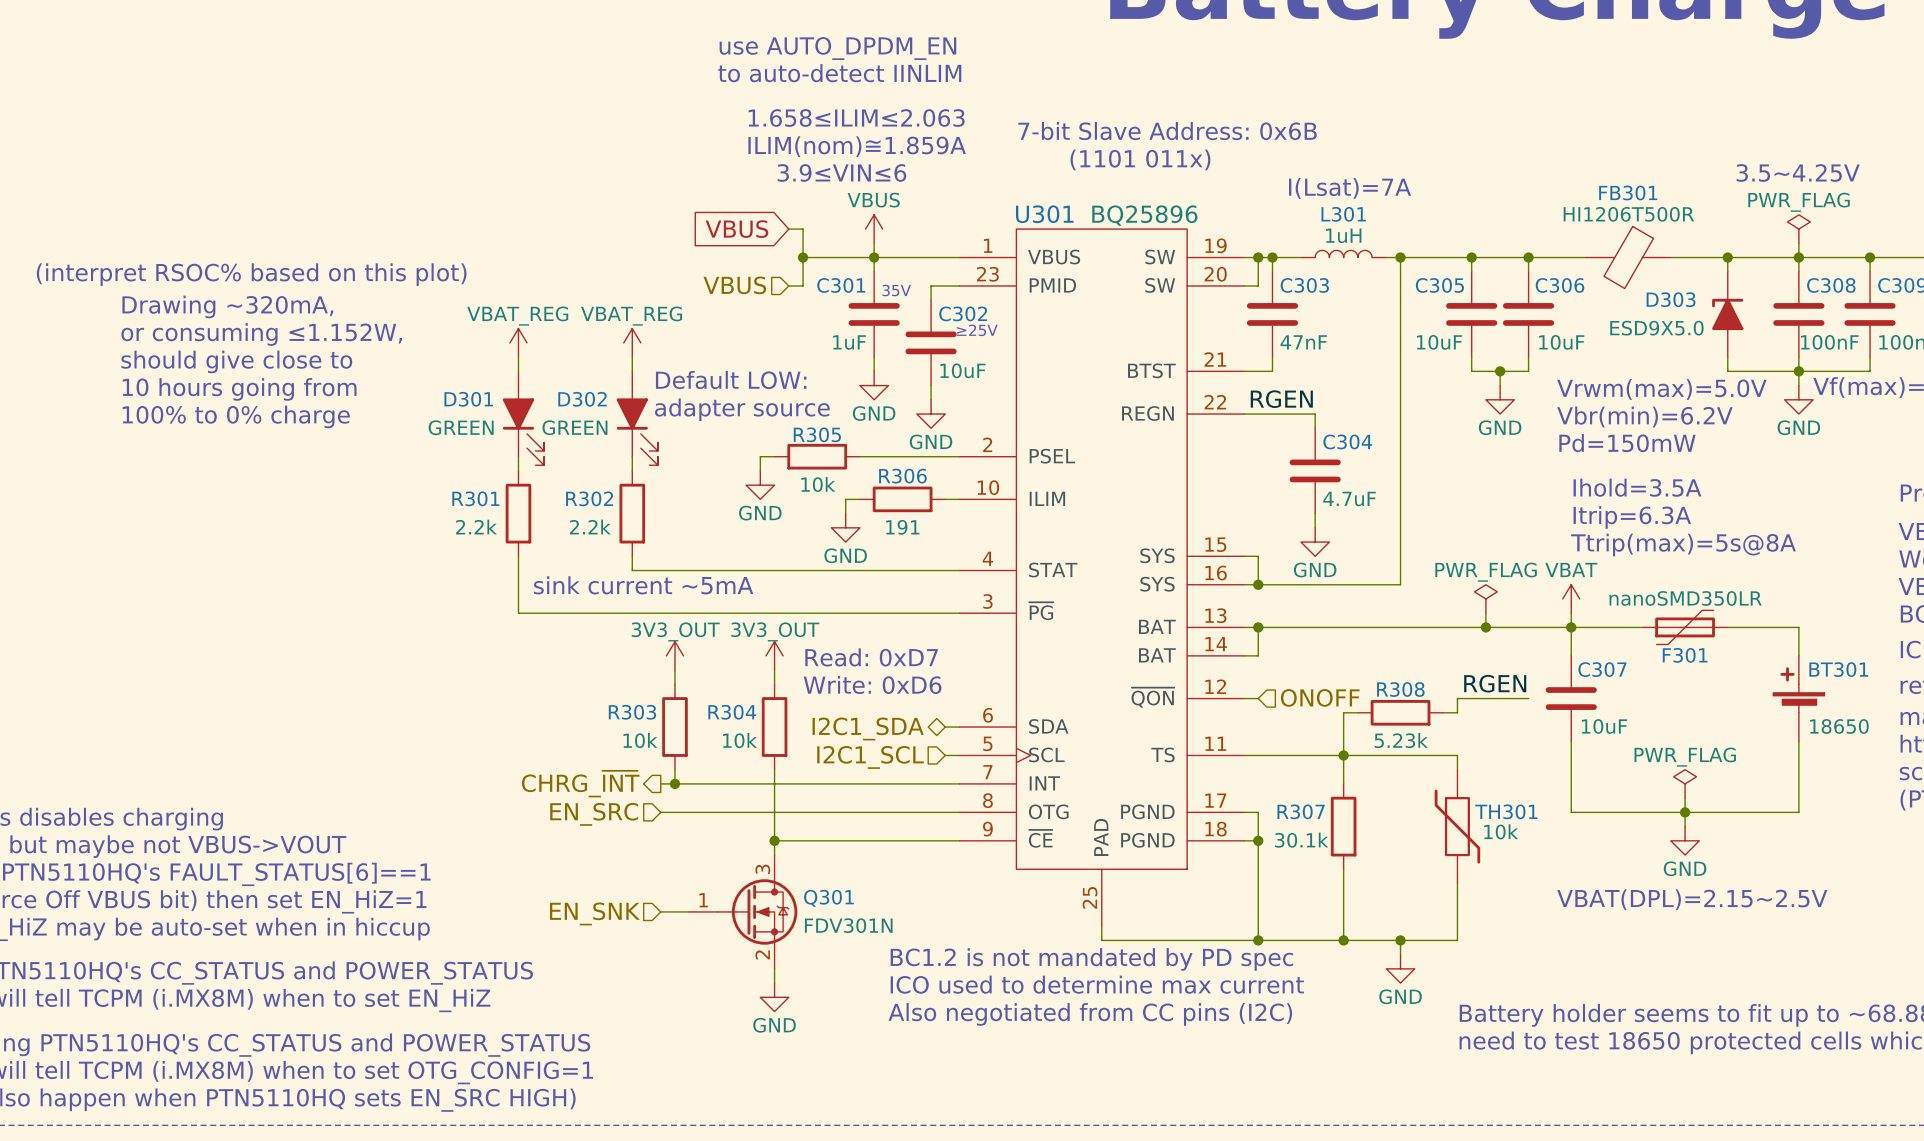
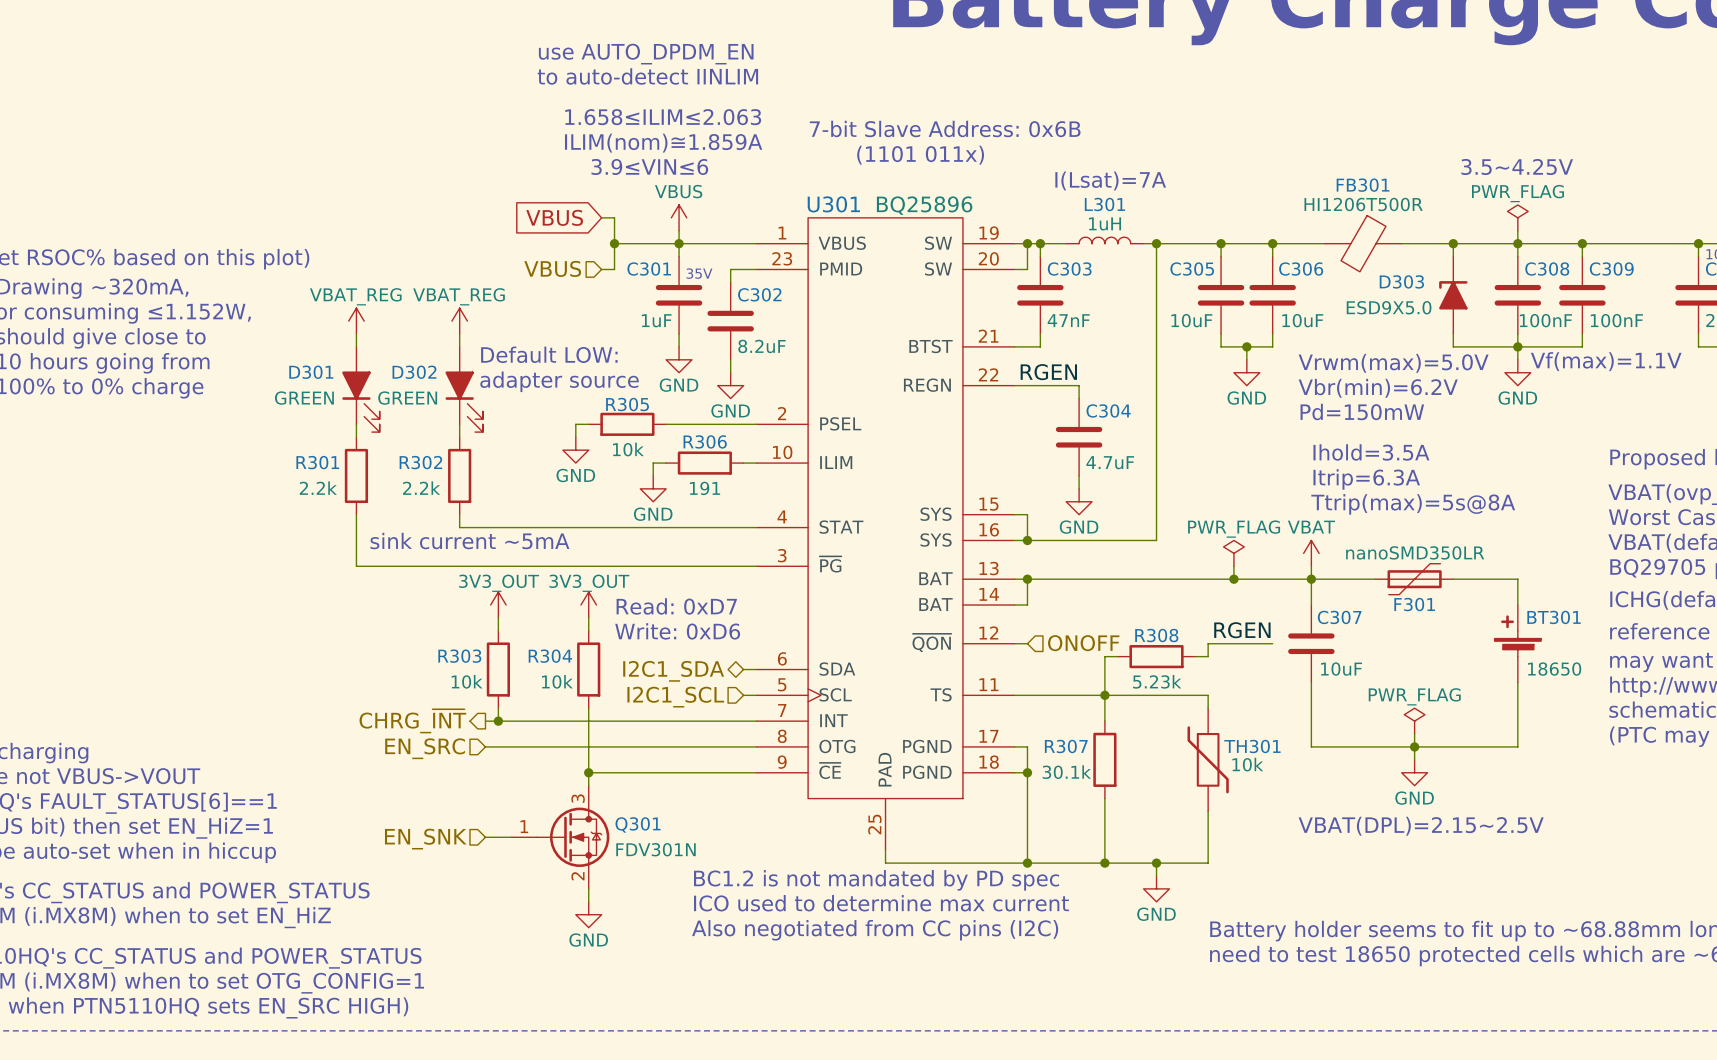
text: ≥25V (977, 330) -> none
C302 value: 10uF (962, 370) -> 8.2uF (761, 346)

